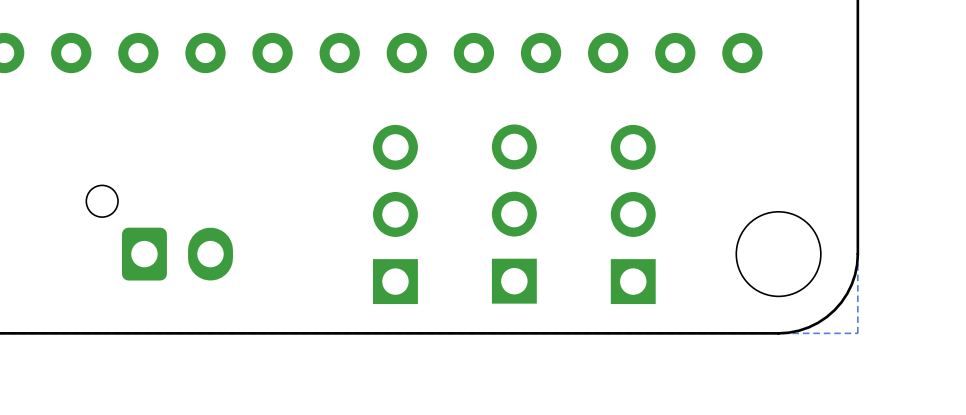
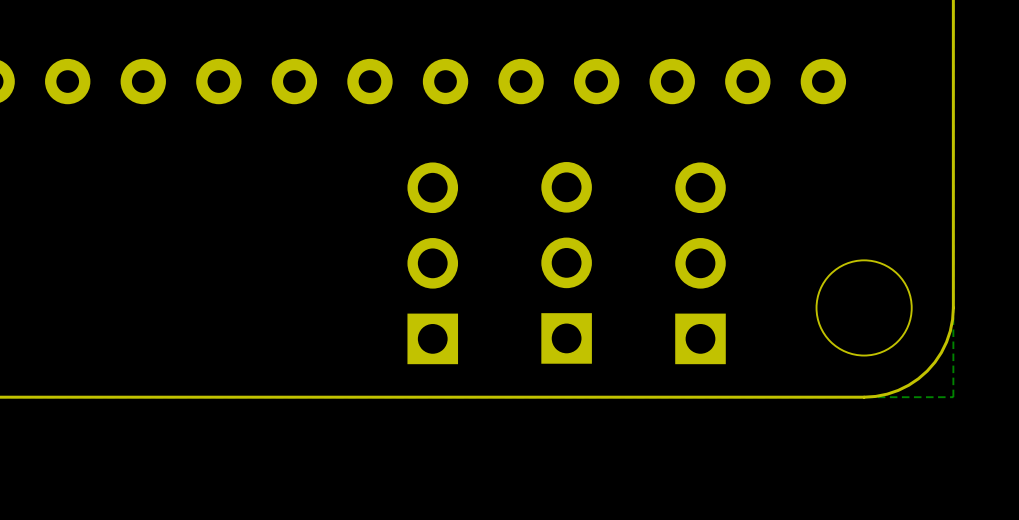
part: (159, 232) -> none

